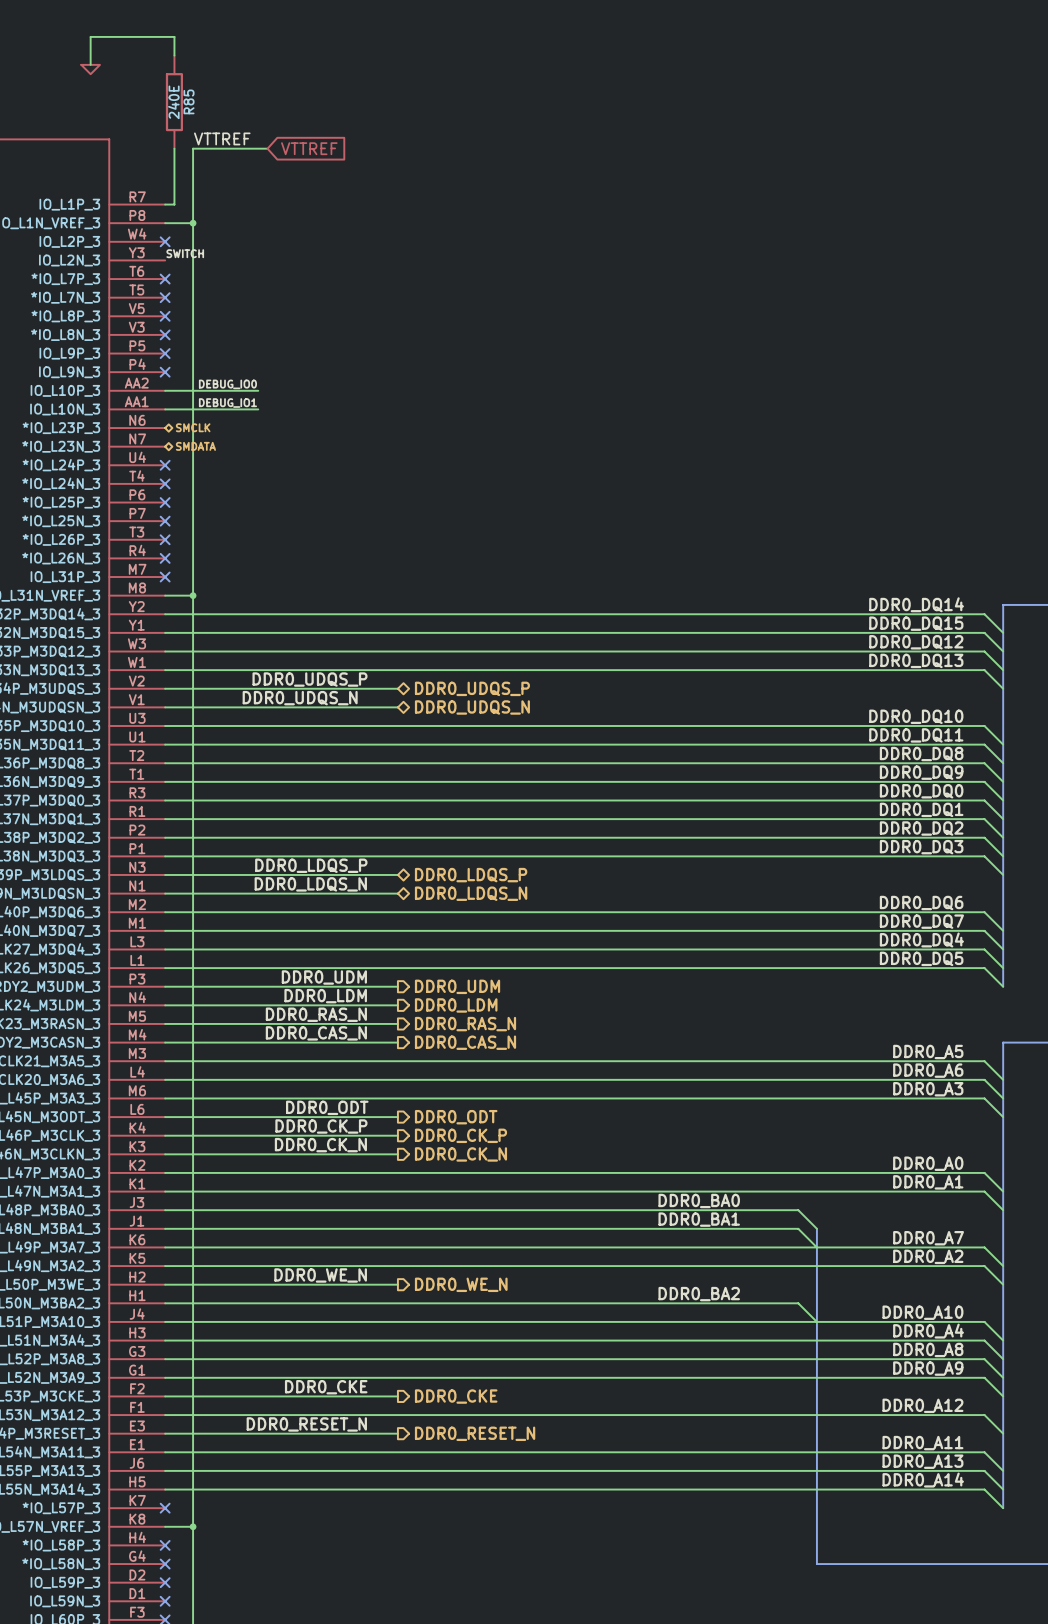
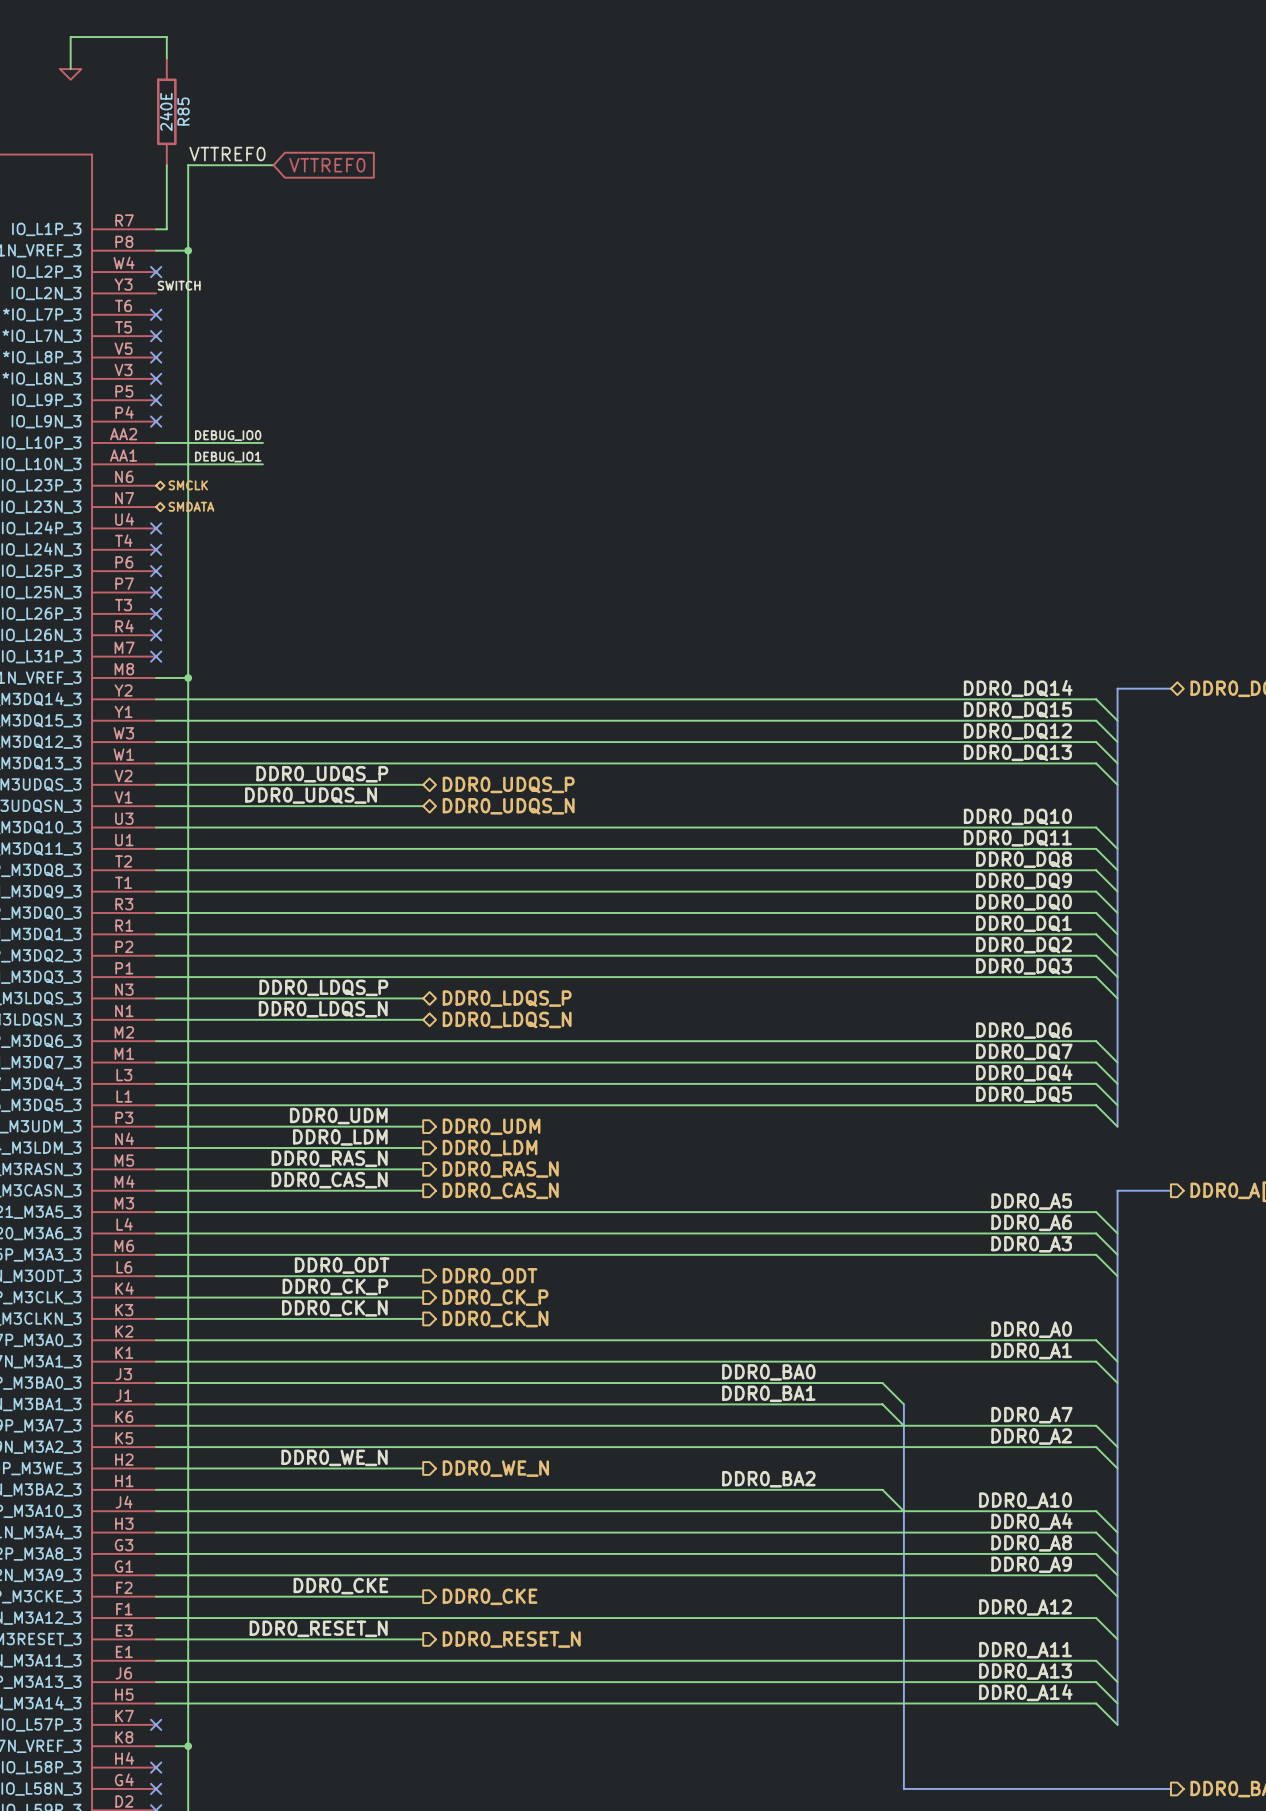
label: VTTREF (222, 138) -> VTTREF0 (227, 154)
global label: VTTREF (309, 148) -> VTTREF0 (327, 165)

